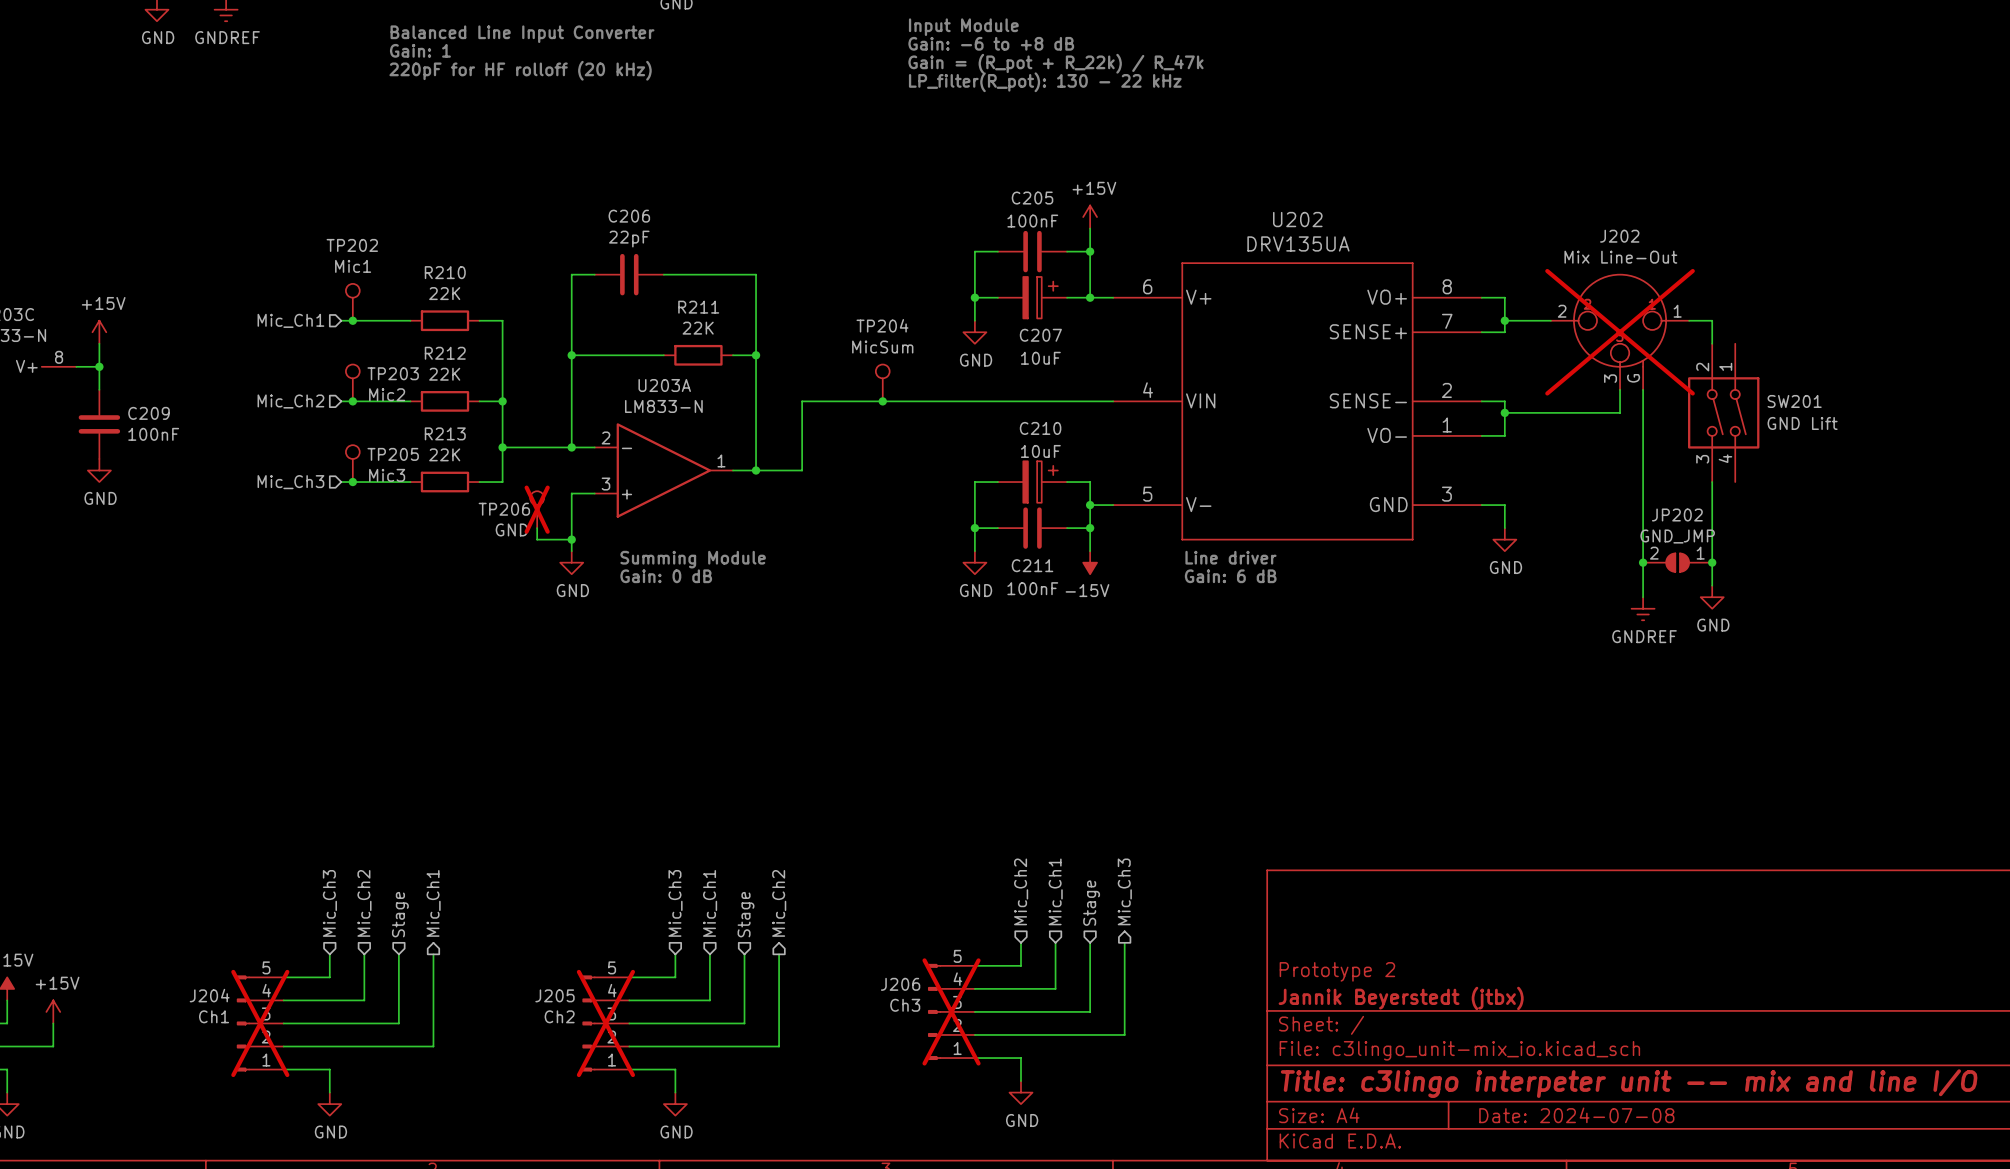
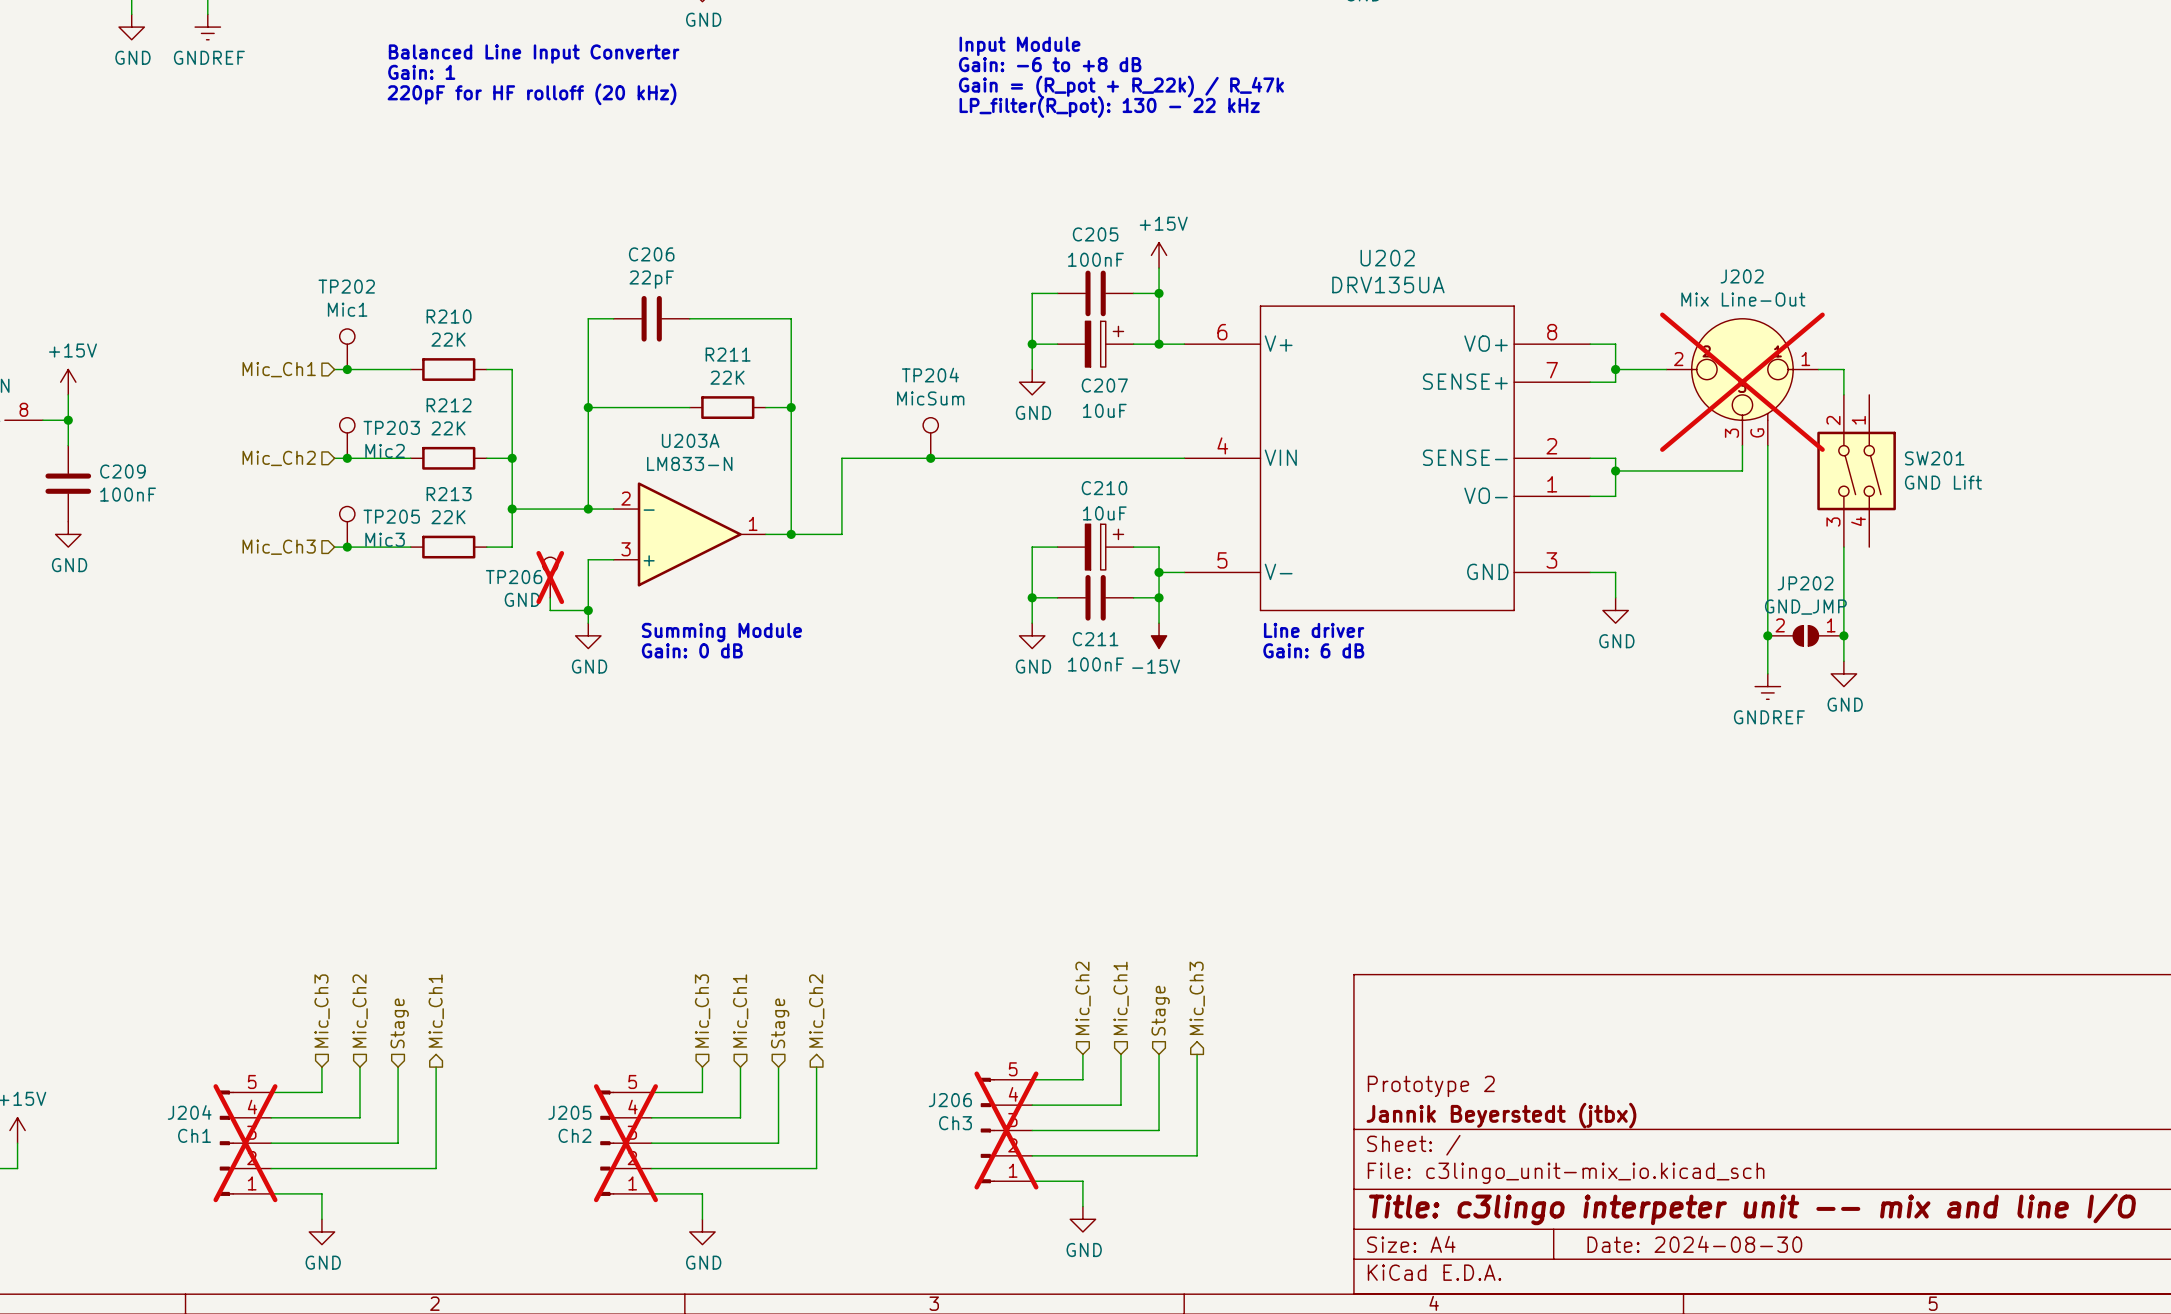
title block: Date: 2024-07-08 (1576, 1115) -> Date: 2024-08-30 (1694, 1244)

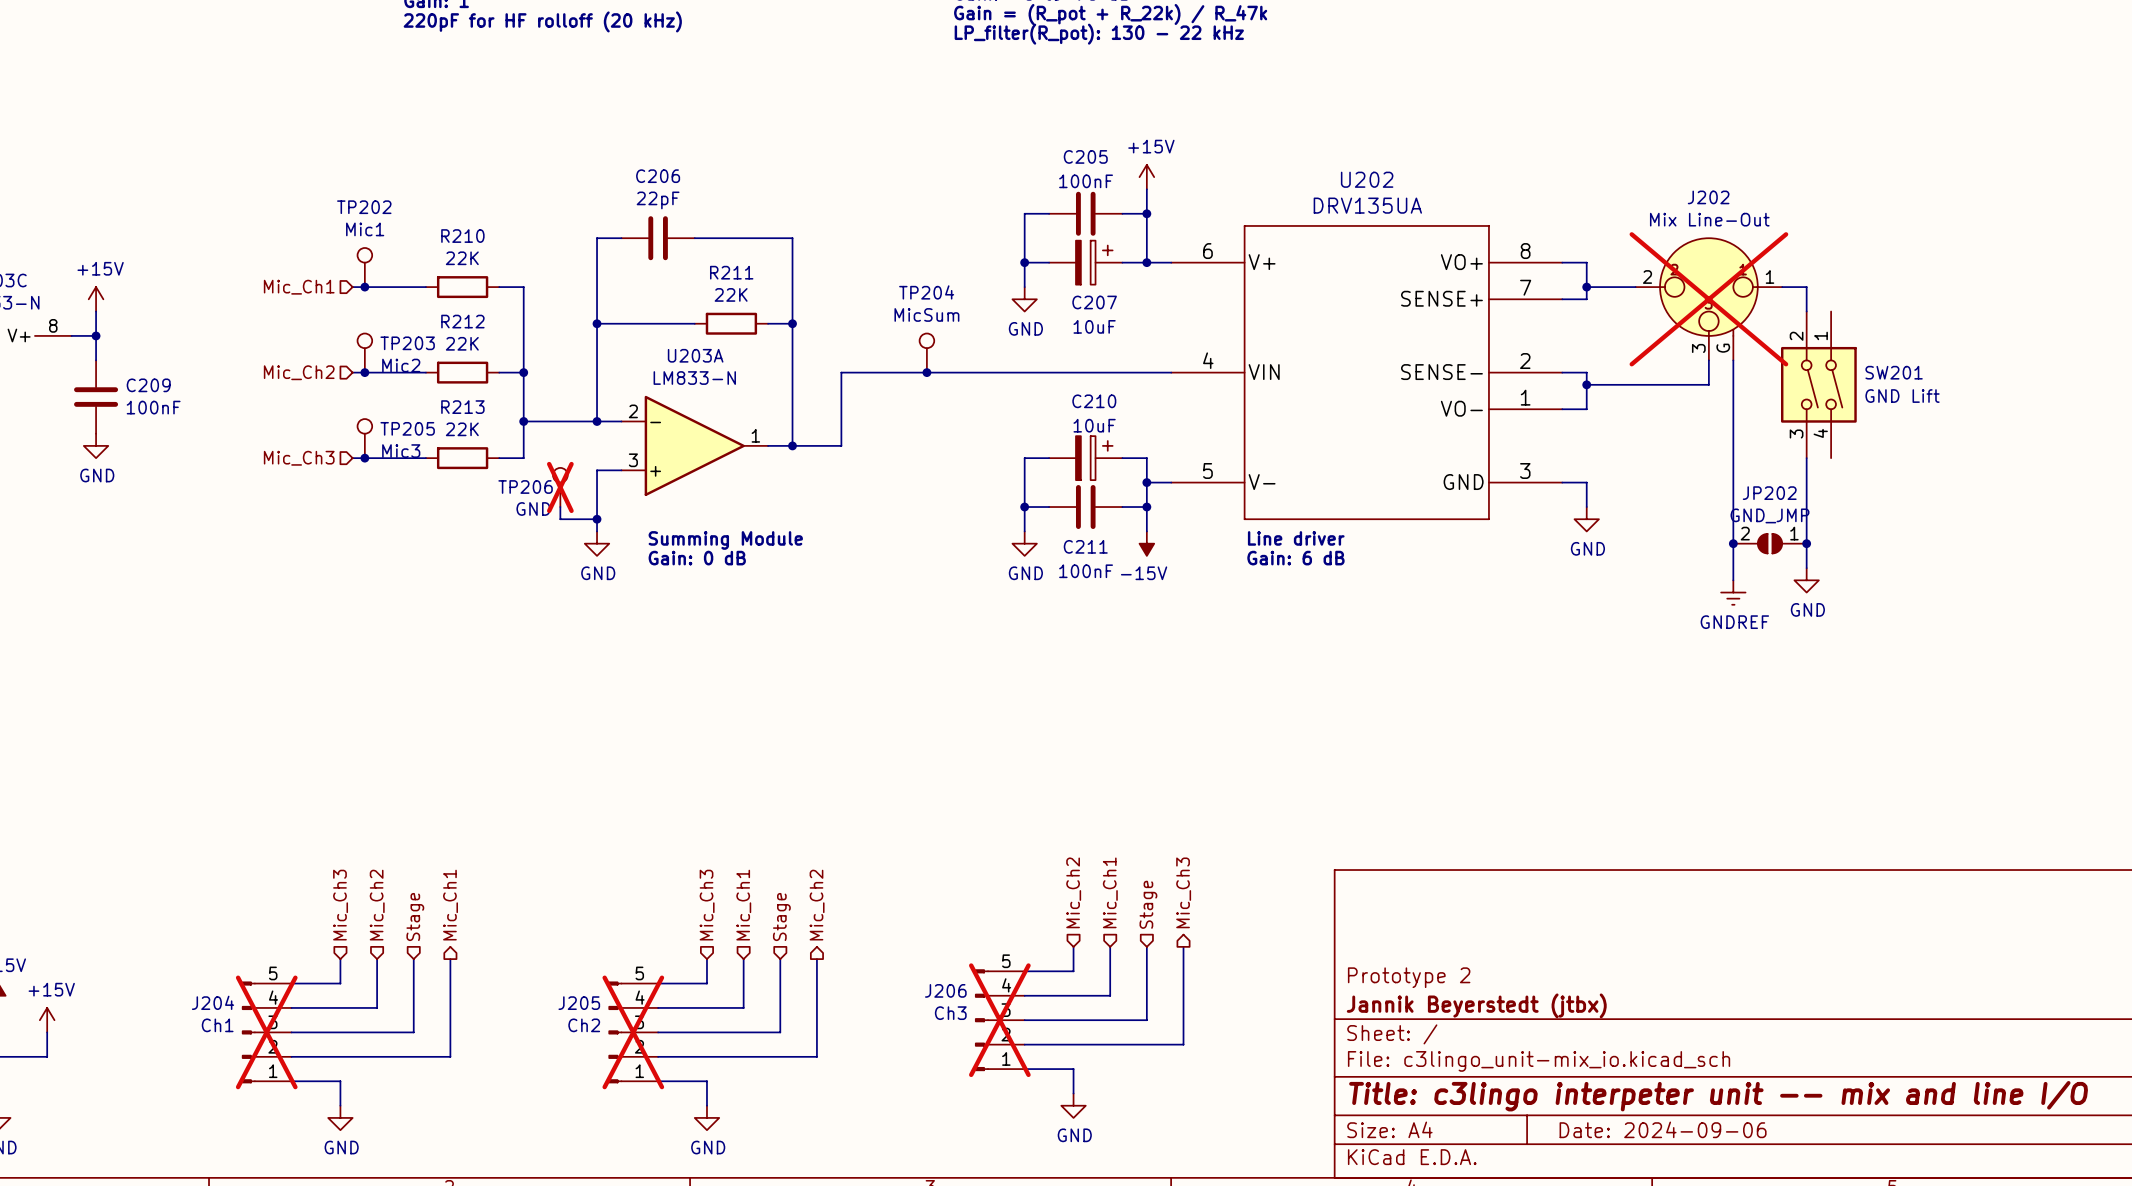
title block: Date: 2024-08-30 (1694, 1244) -> Date: 2024-09-06 (1663, 1129)

